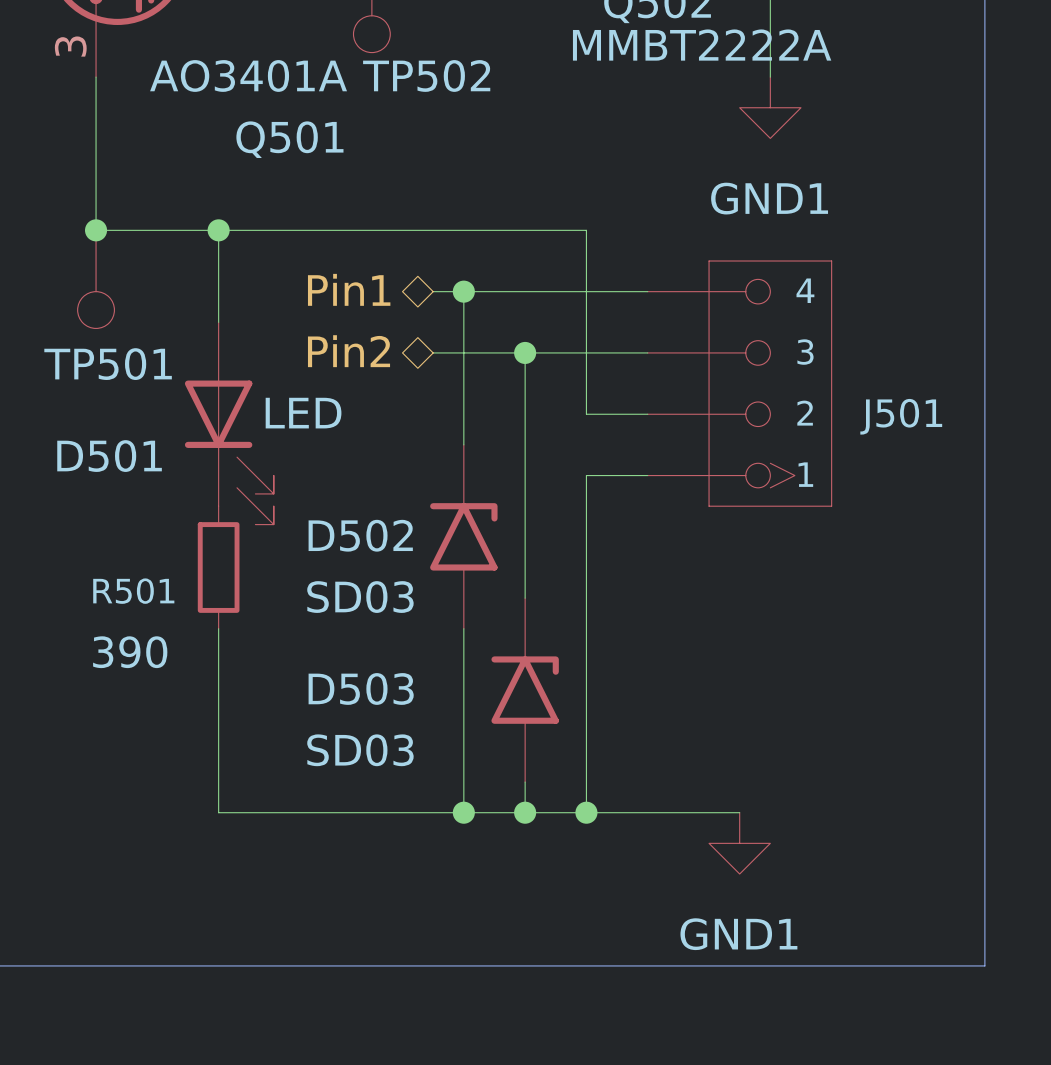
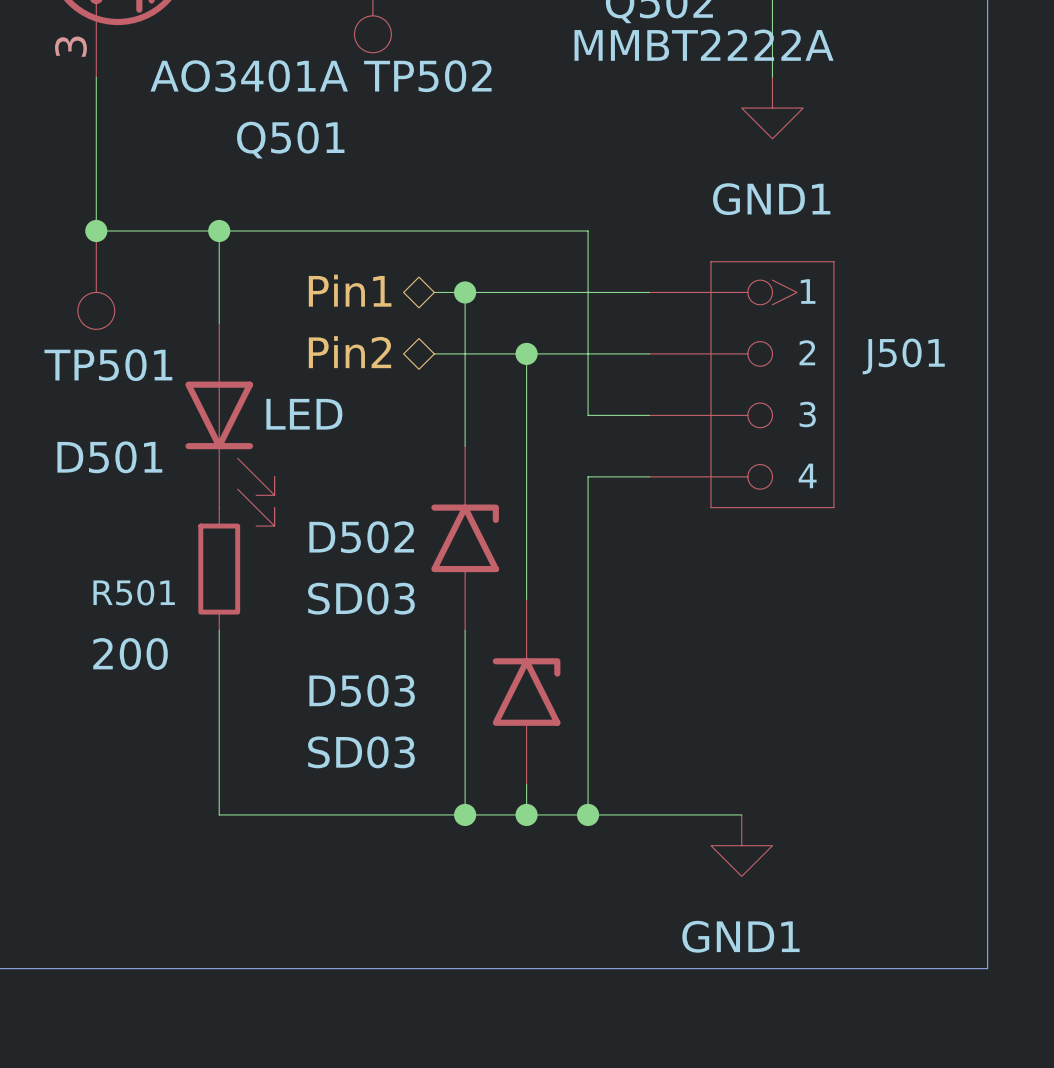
J501 flip: as is (770, 383) -> up-down (772, 384)
R501 value: 390 (130, 652) -> 200 (130, 654)

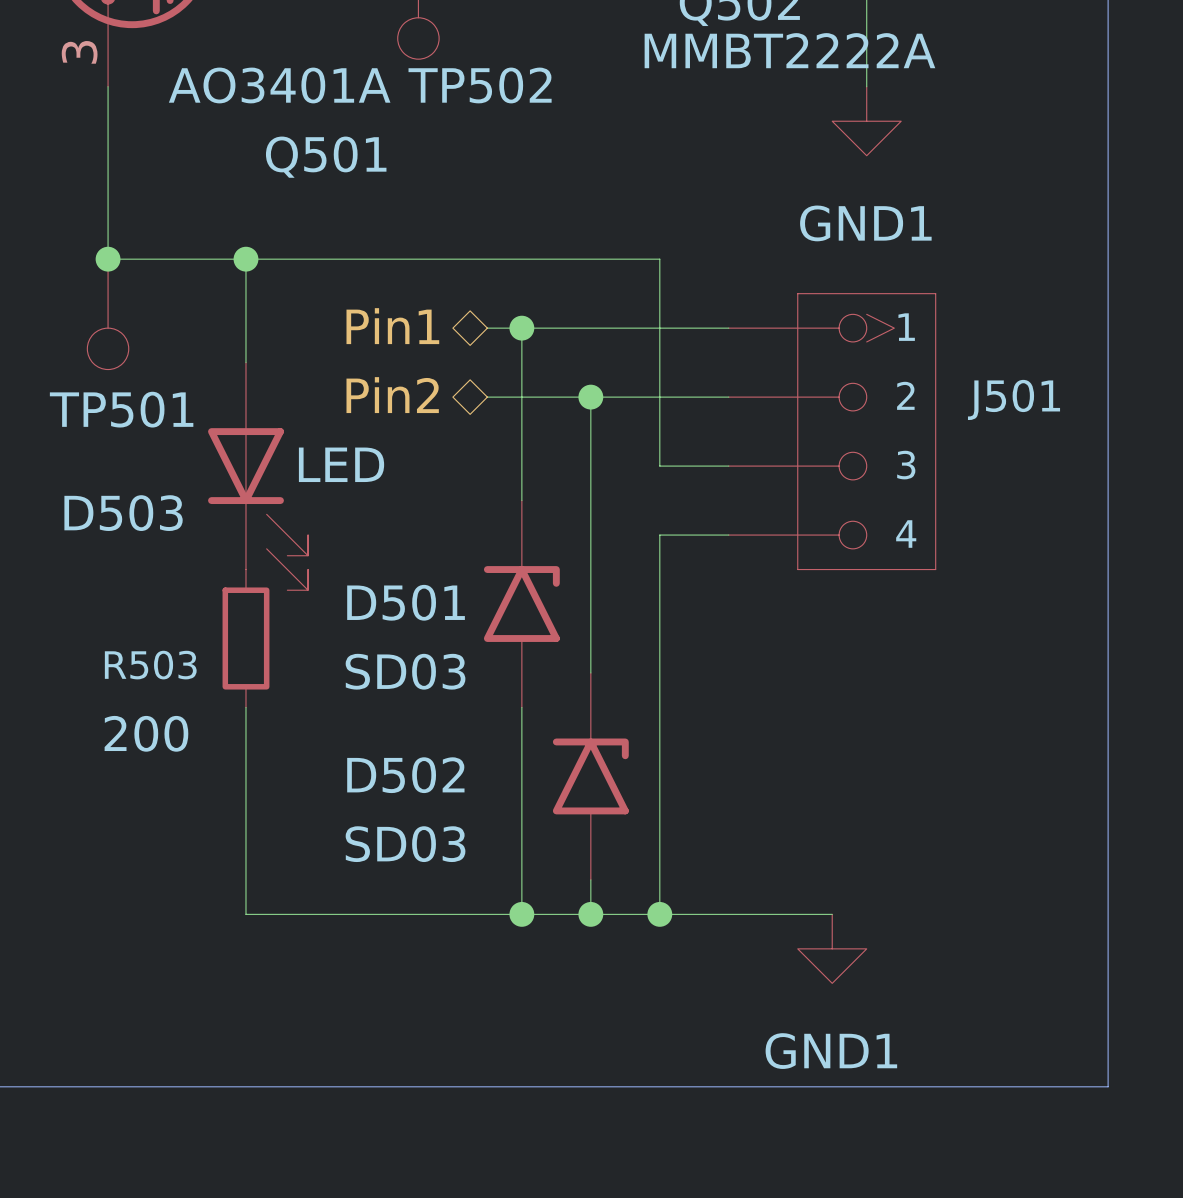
D501 name: D501 (109, 457) -> D503 (123, 513)
D502 name: D502 (361, 537) -> D501 (406, 602)
R501 name: R501 (134, 592) -> R503 (150, 665)
D503 name: D503 (362, 690) -> D502 (405, 775)

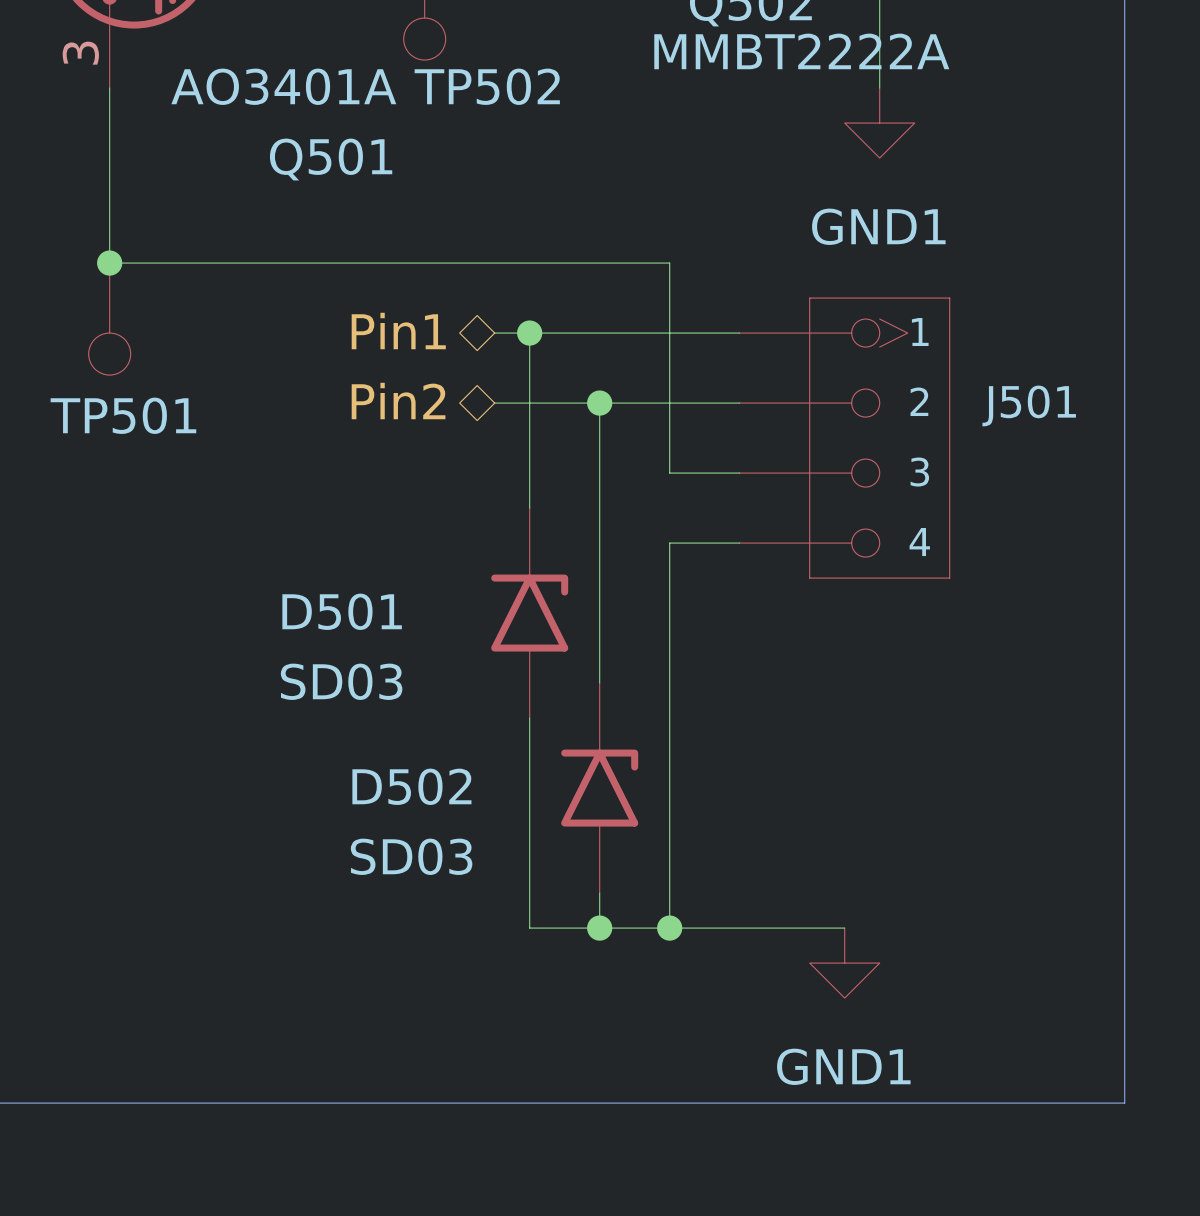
wire: (245, 259) (245, 362) -> none
junction: (245, 259) -> none
D503: LED (258, 476) -> none
D501 name position: D501 (406, 602) -> D501 (342, 611)
R503: 200 (245, 638) -> none
D501 value position: SD03 (405, 671) -> SD03 (341, 681)
wire: (245, 707) (245, 914) (521, 914) -> none
junction: (521, 914) -> none

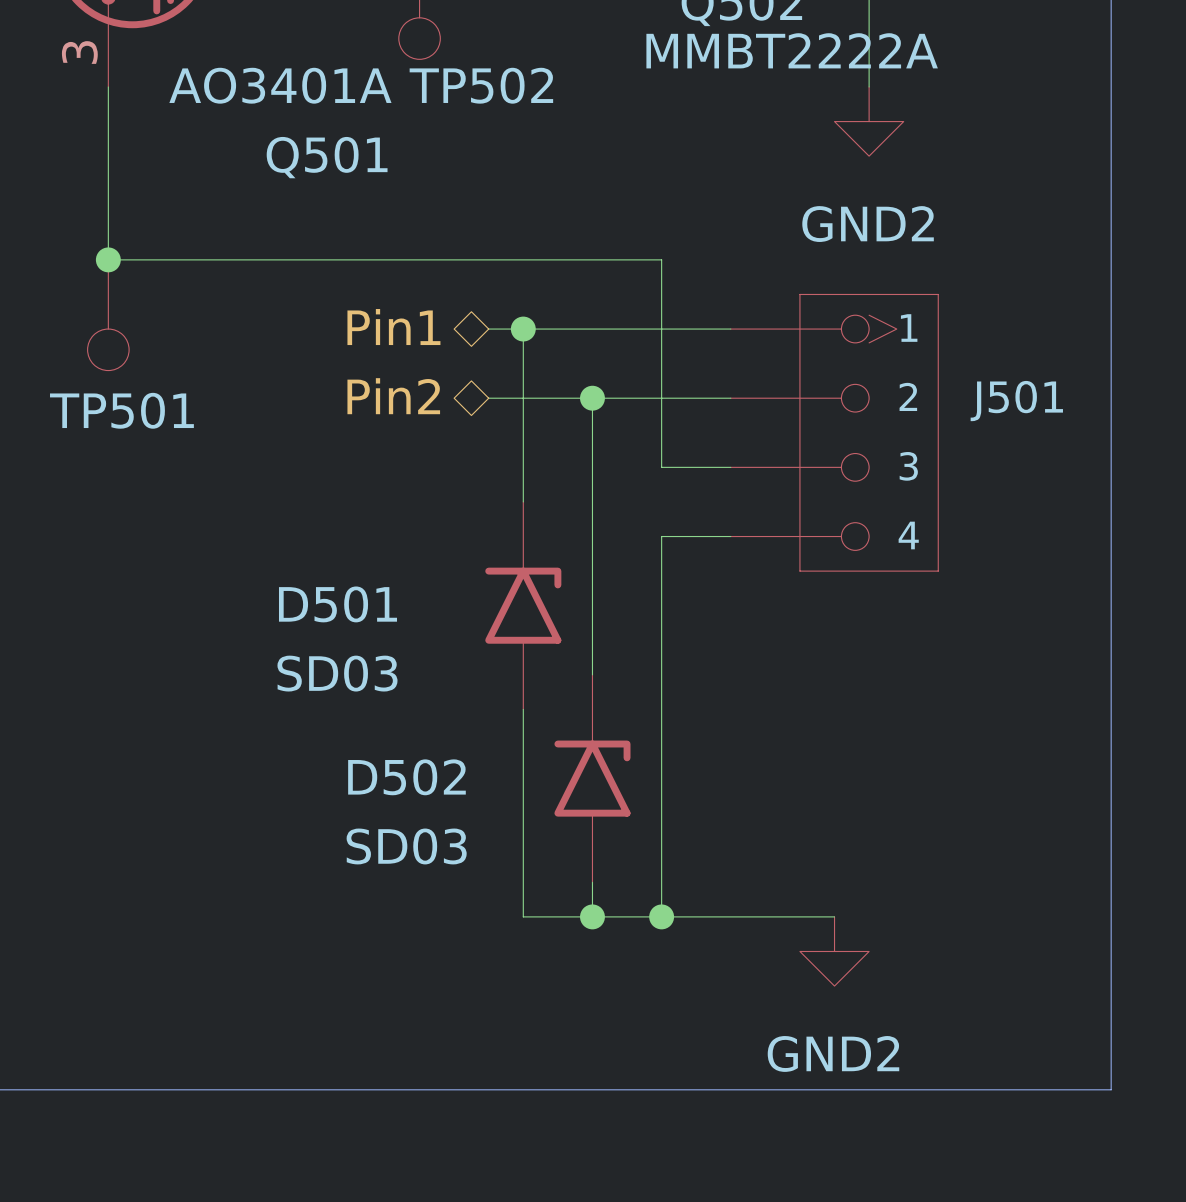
power symbol: GND1 (879, 123) -> GND2 (869, 121)
power symbol: GND1 (844, 963) -> GND2 (834, 951)

